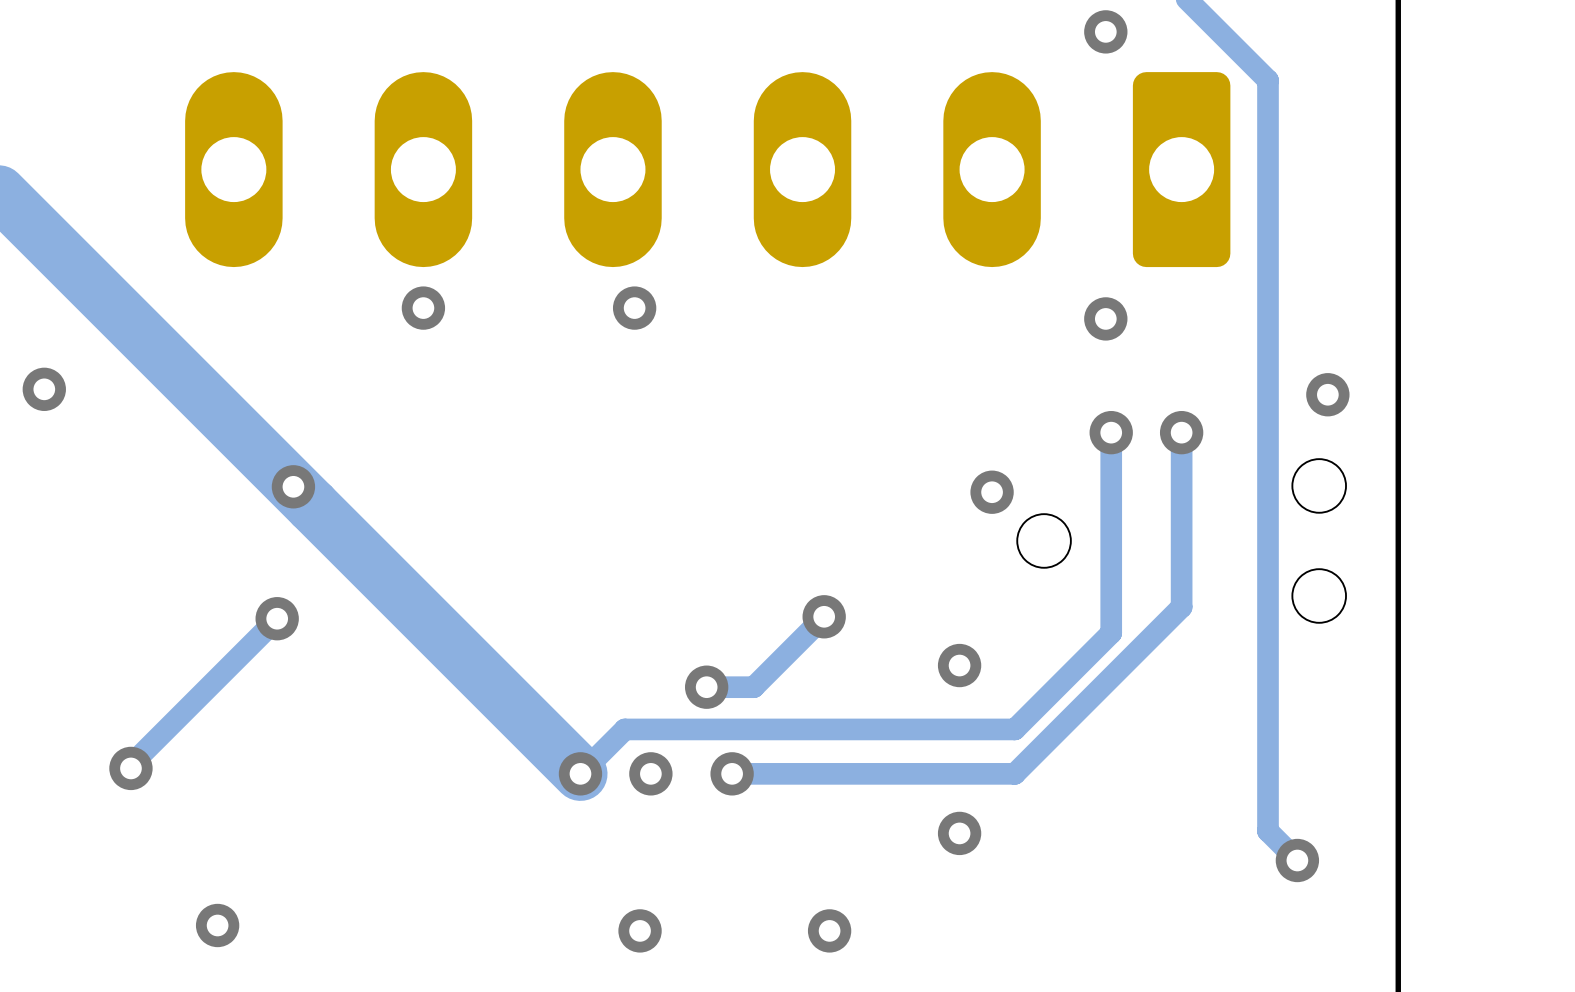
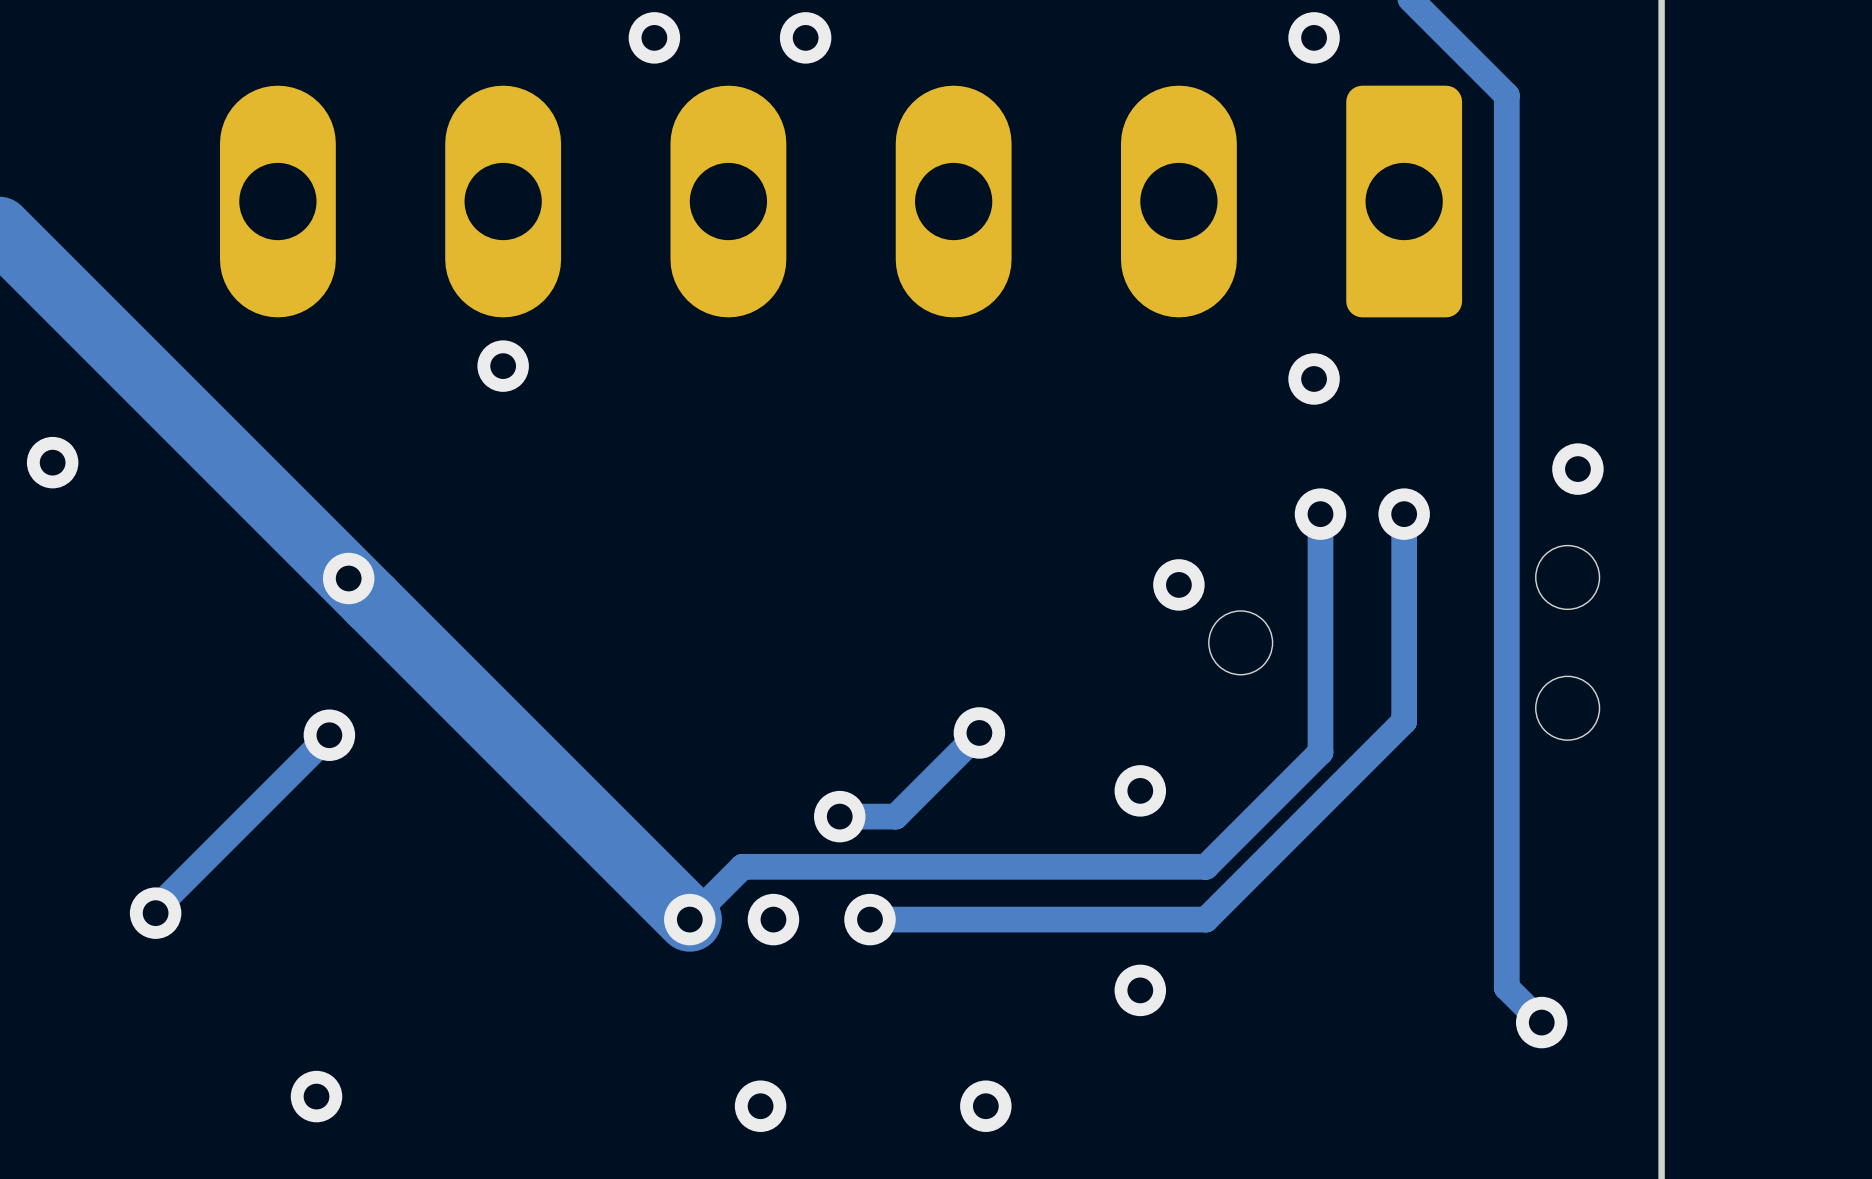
via: none -> (654, 37)
via: none -> (805, 37)
via: (634, 308) -> none
via position: (217, 925) -> (316, 1096)

